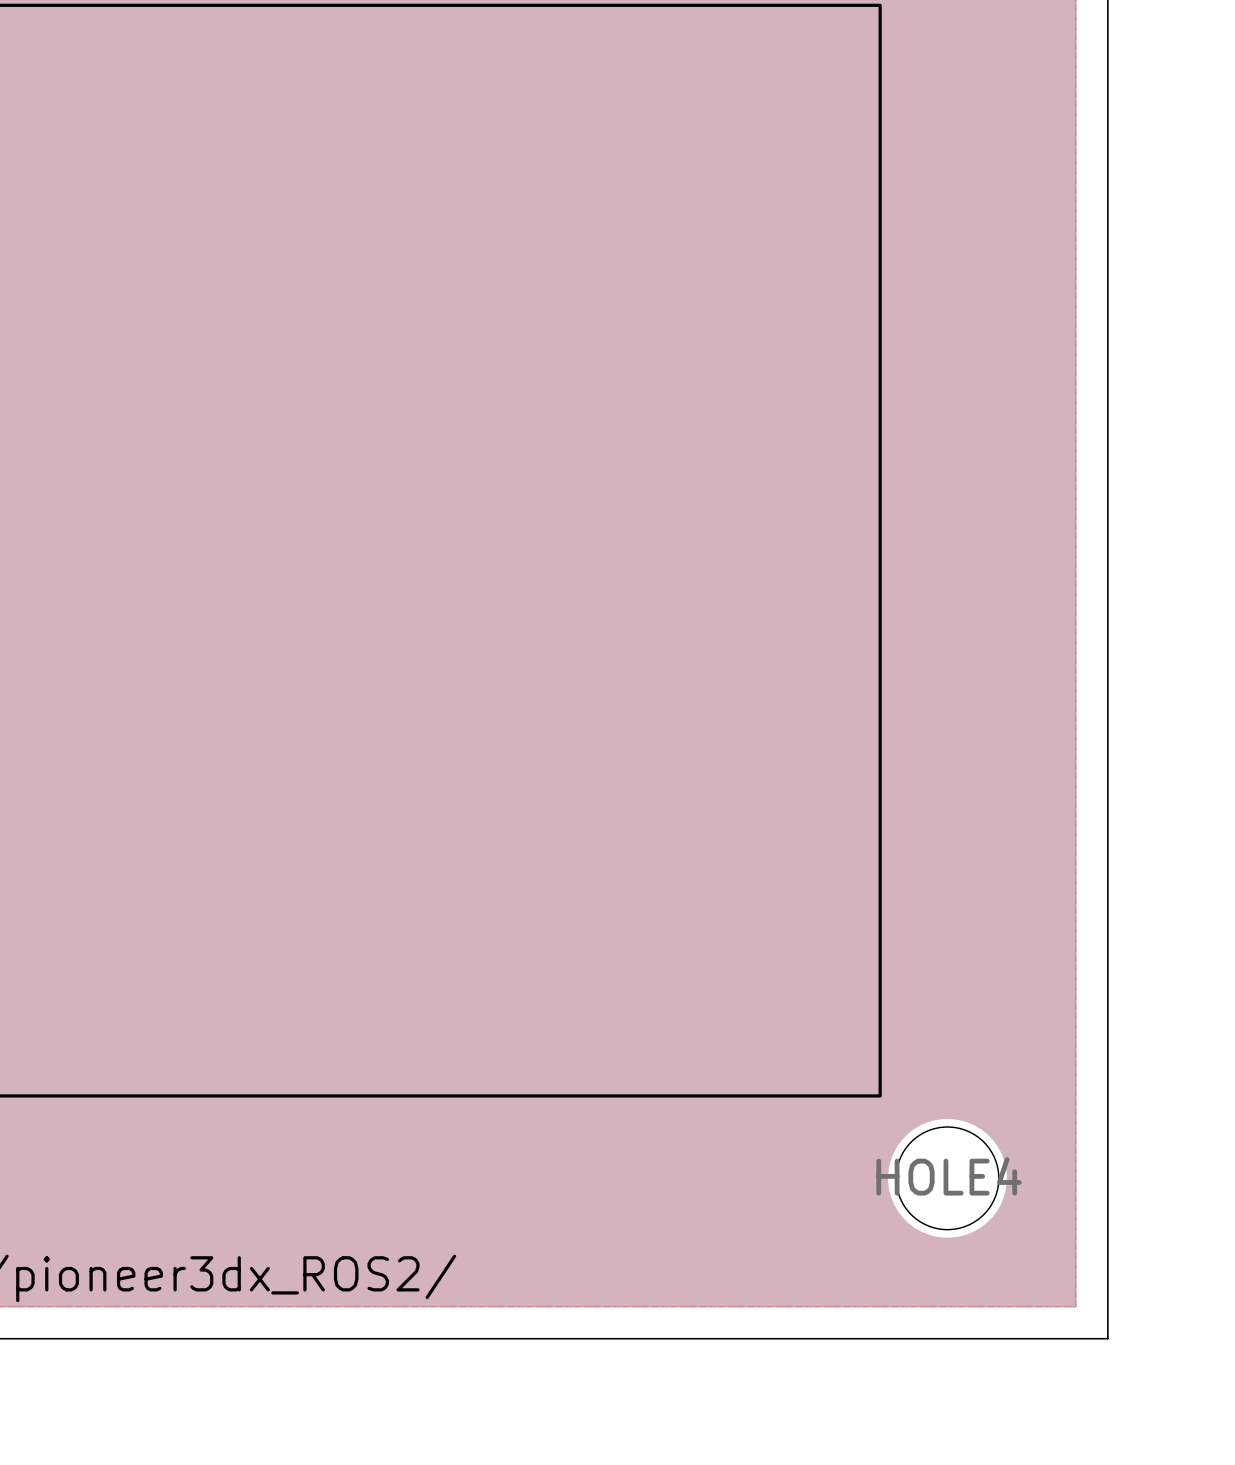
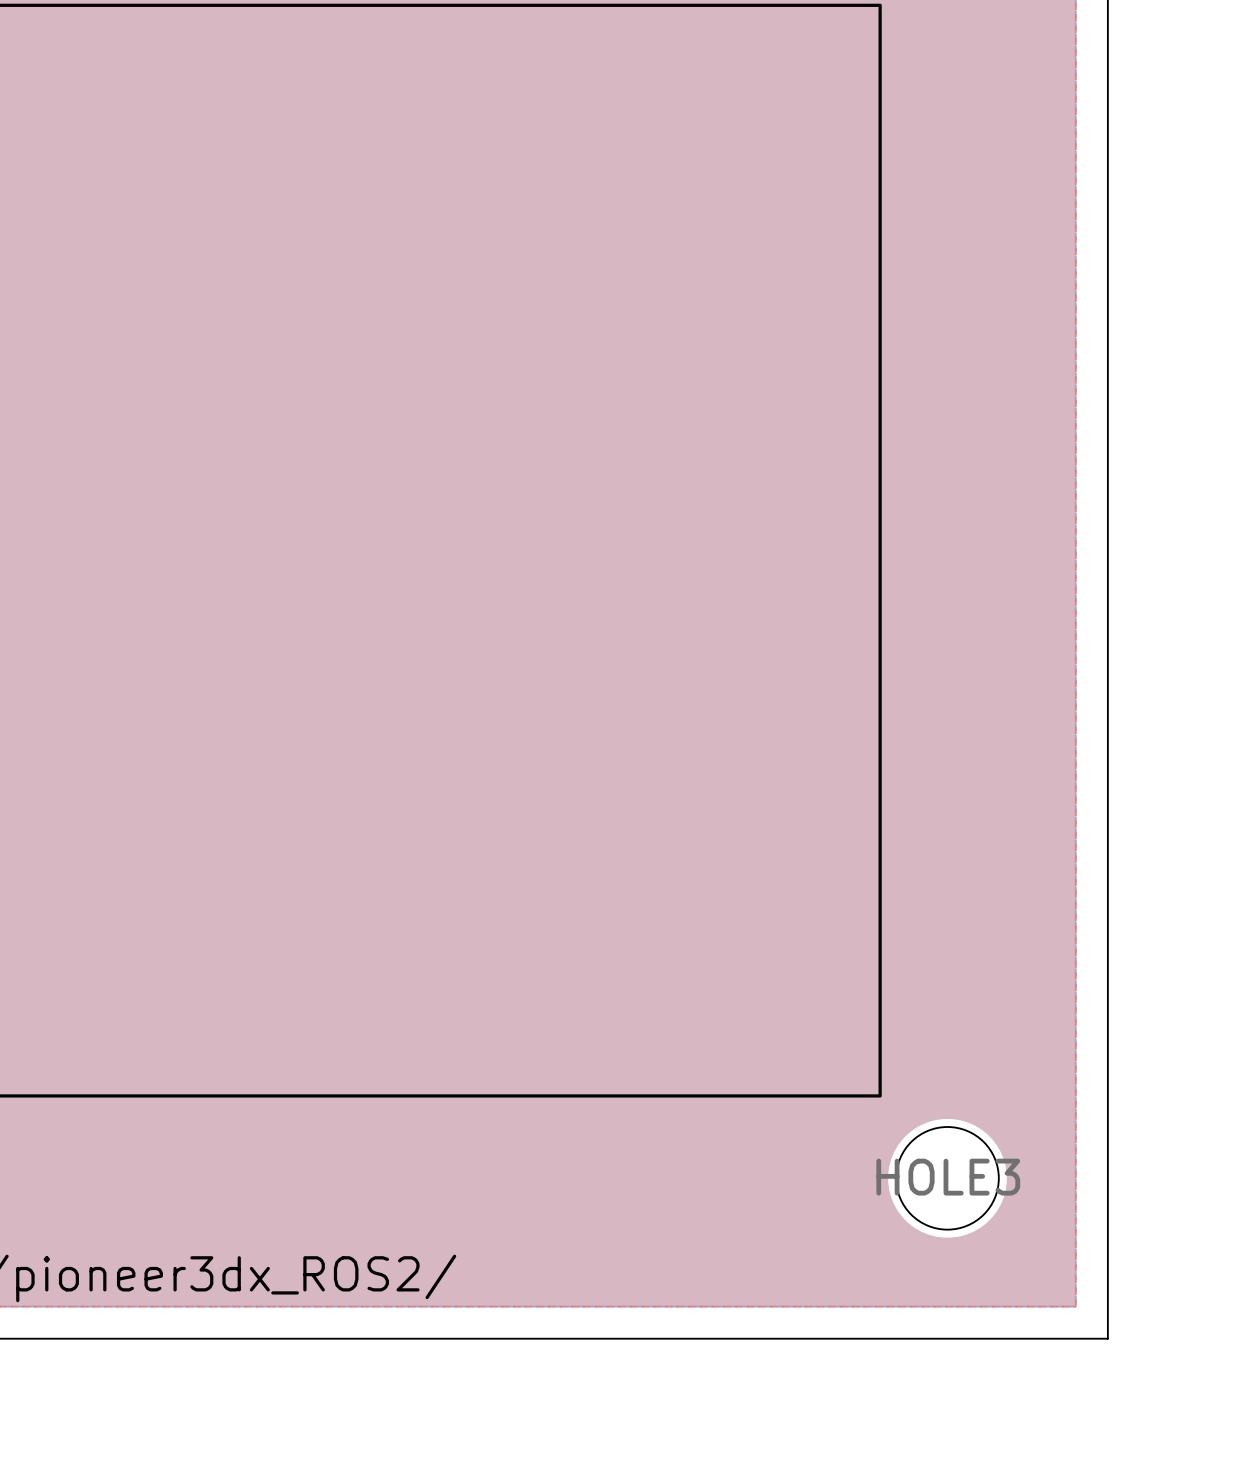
HOLE4 name: HOLE4 (949, 1176) -> HOLE3 (948, 1177)

